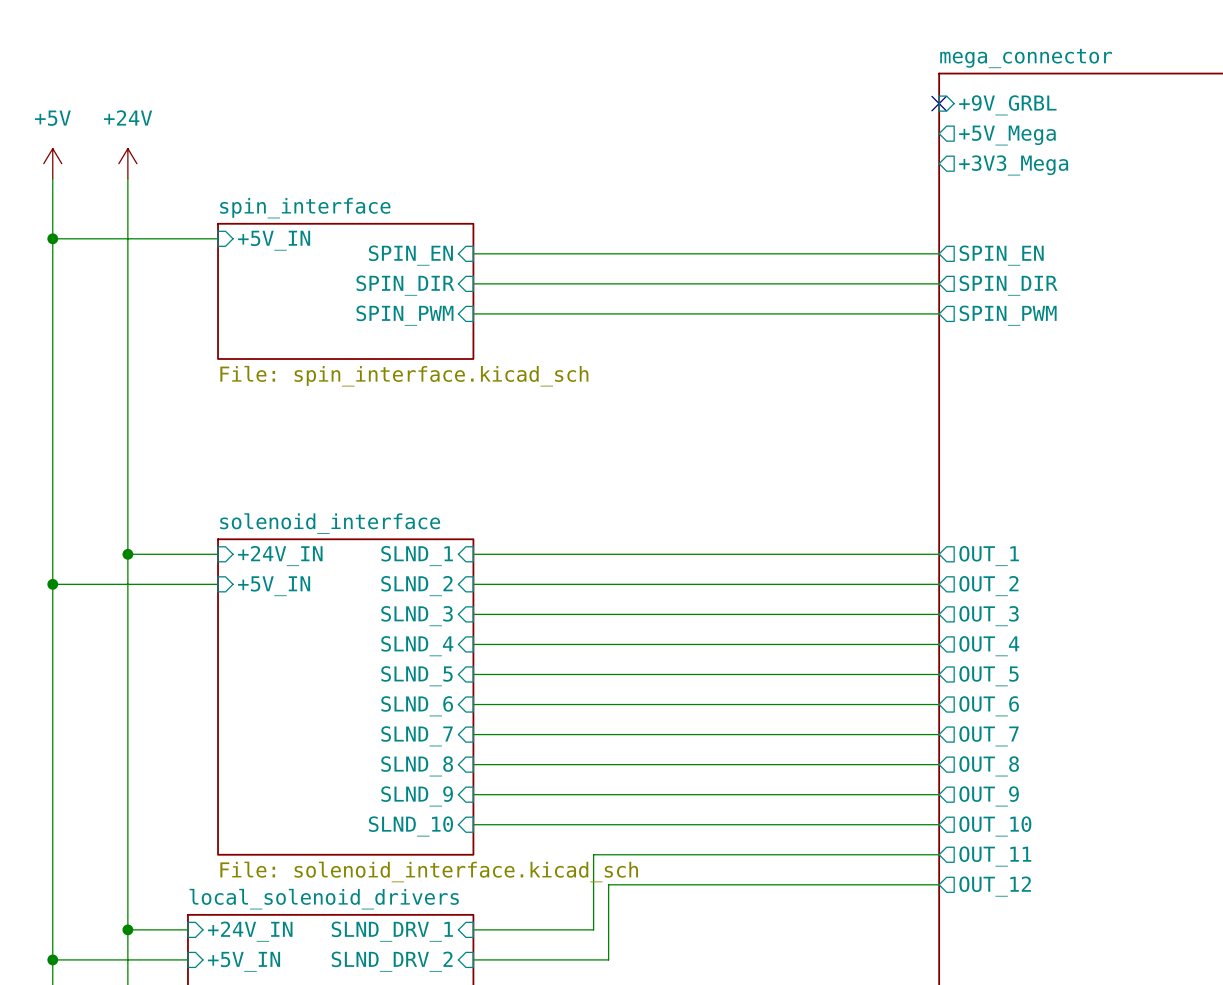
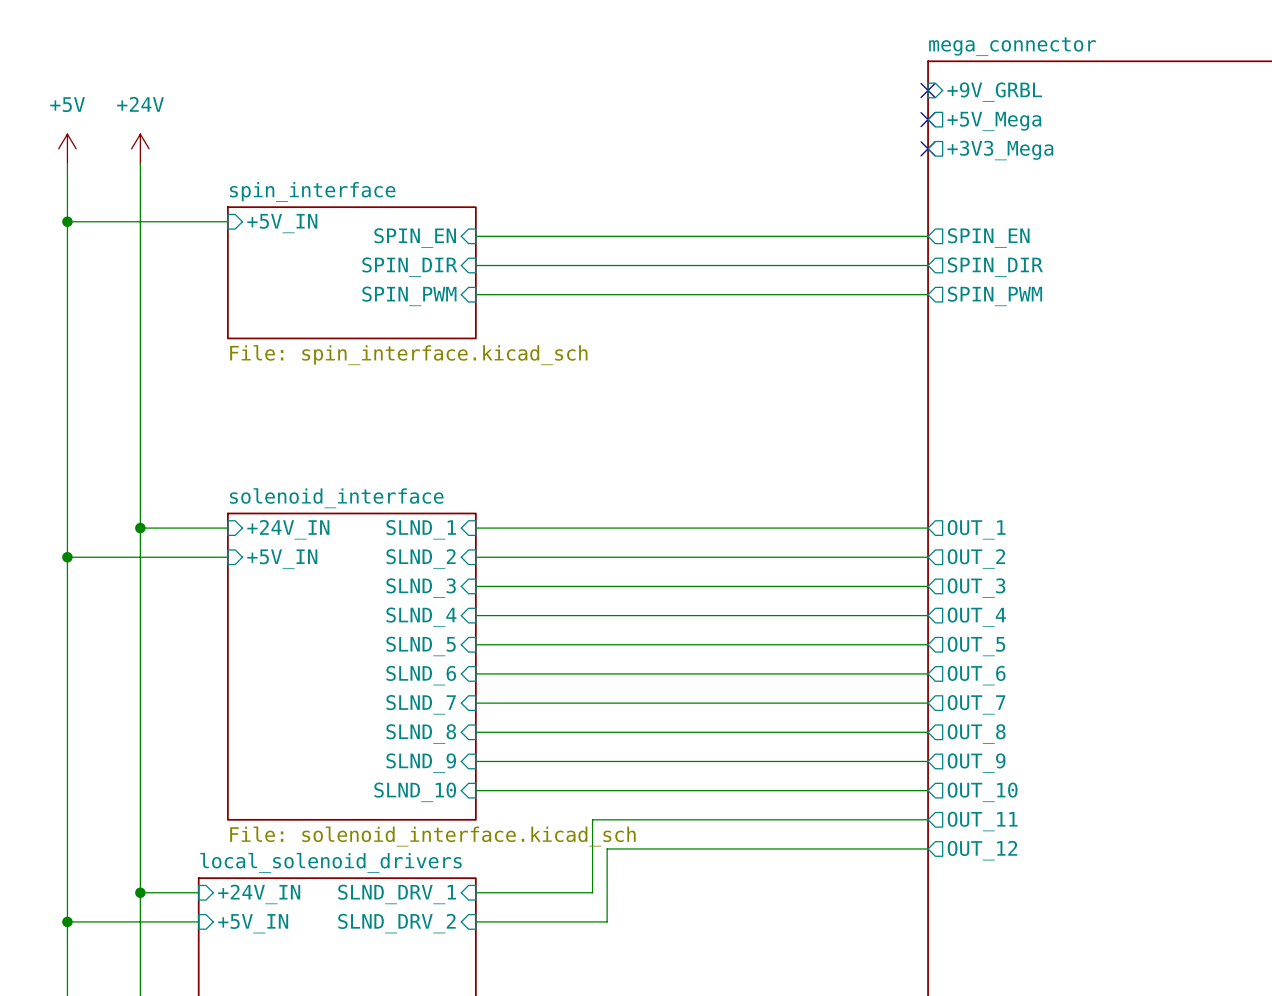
no-connect mark: none -> (928, 119)
no-connect mark: none -> (928, 148)

